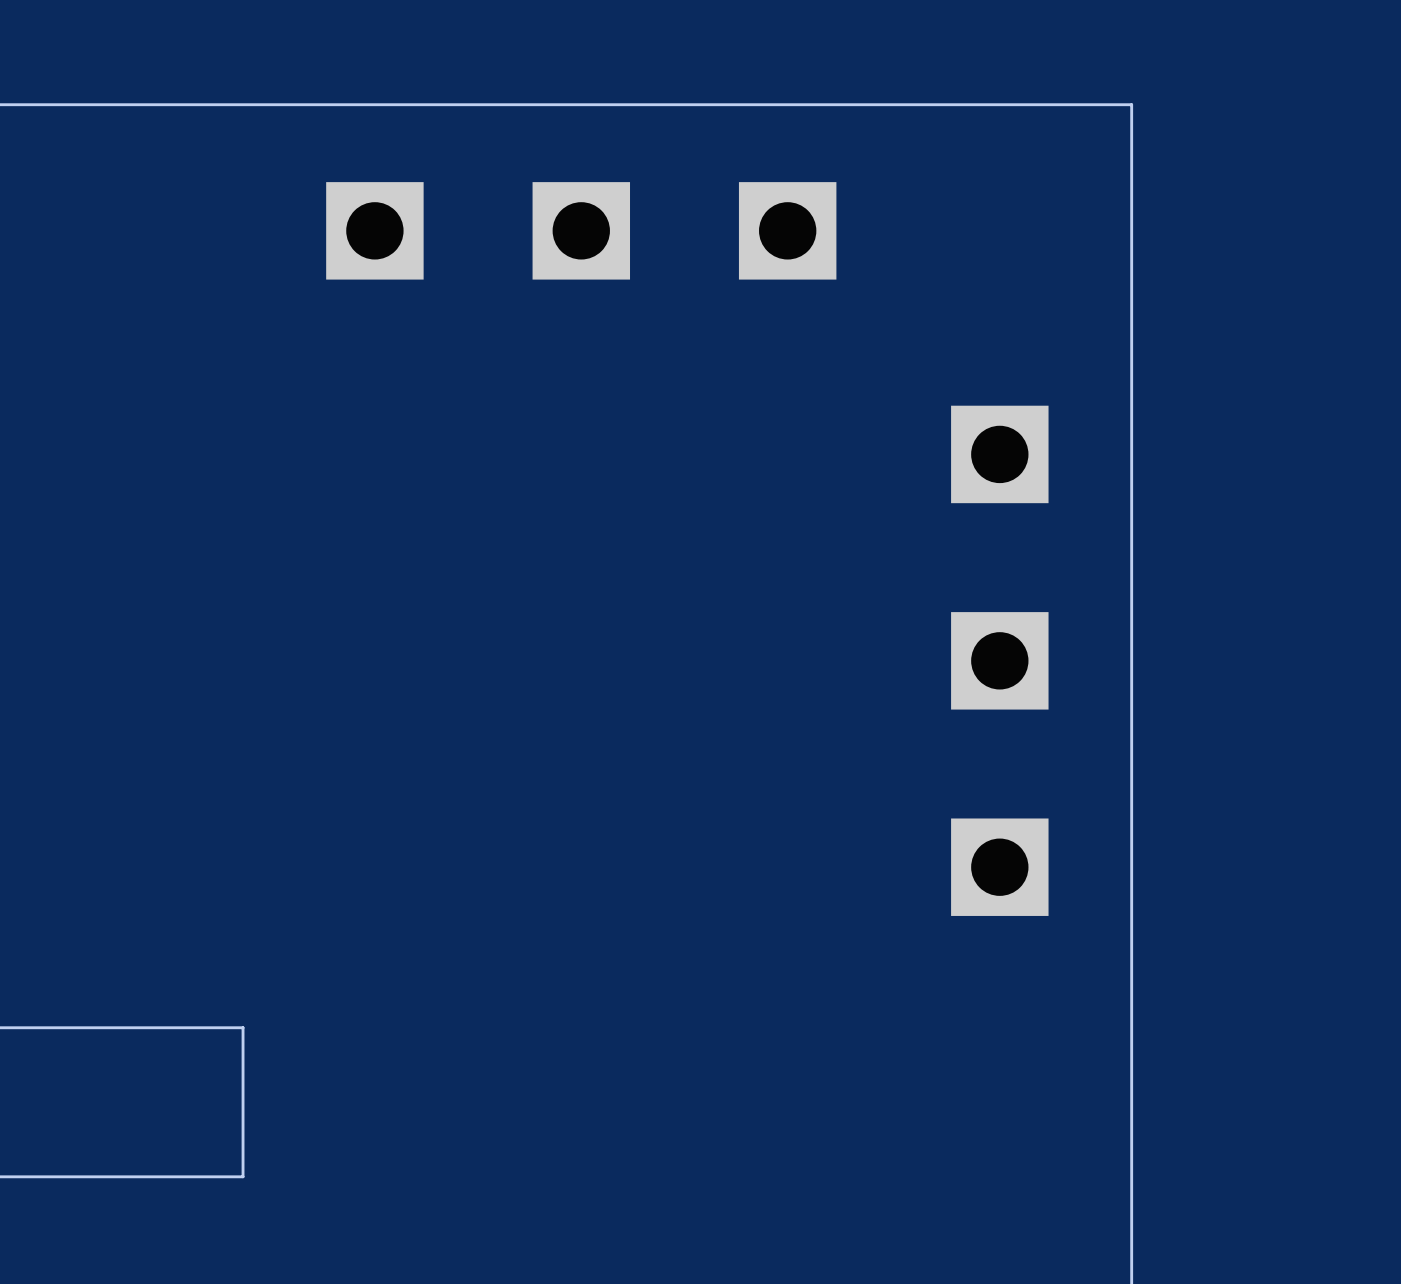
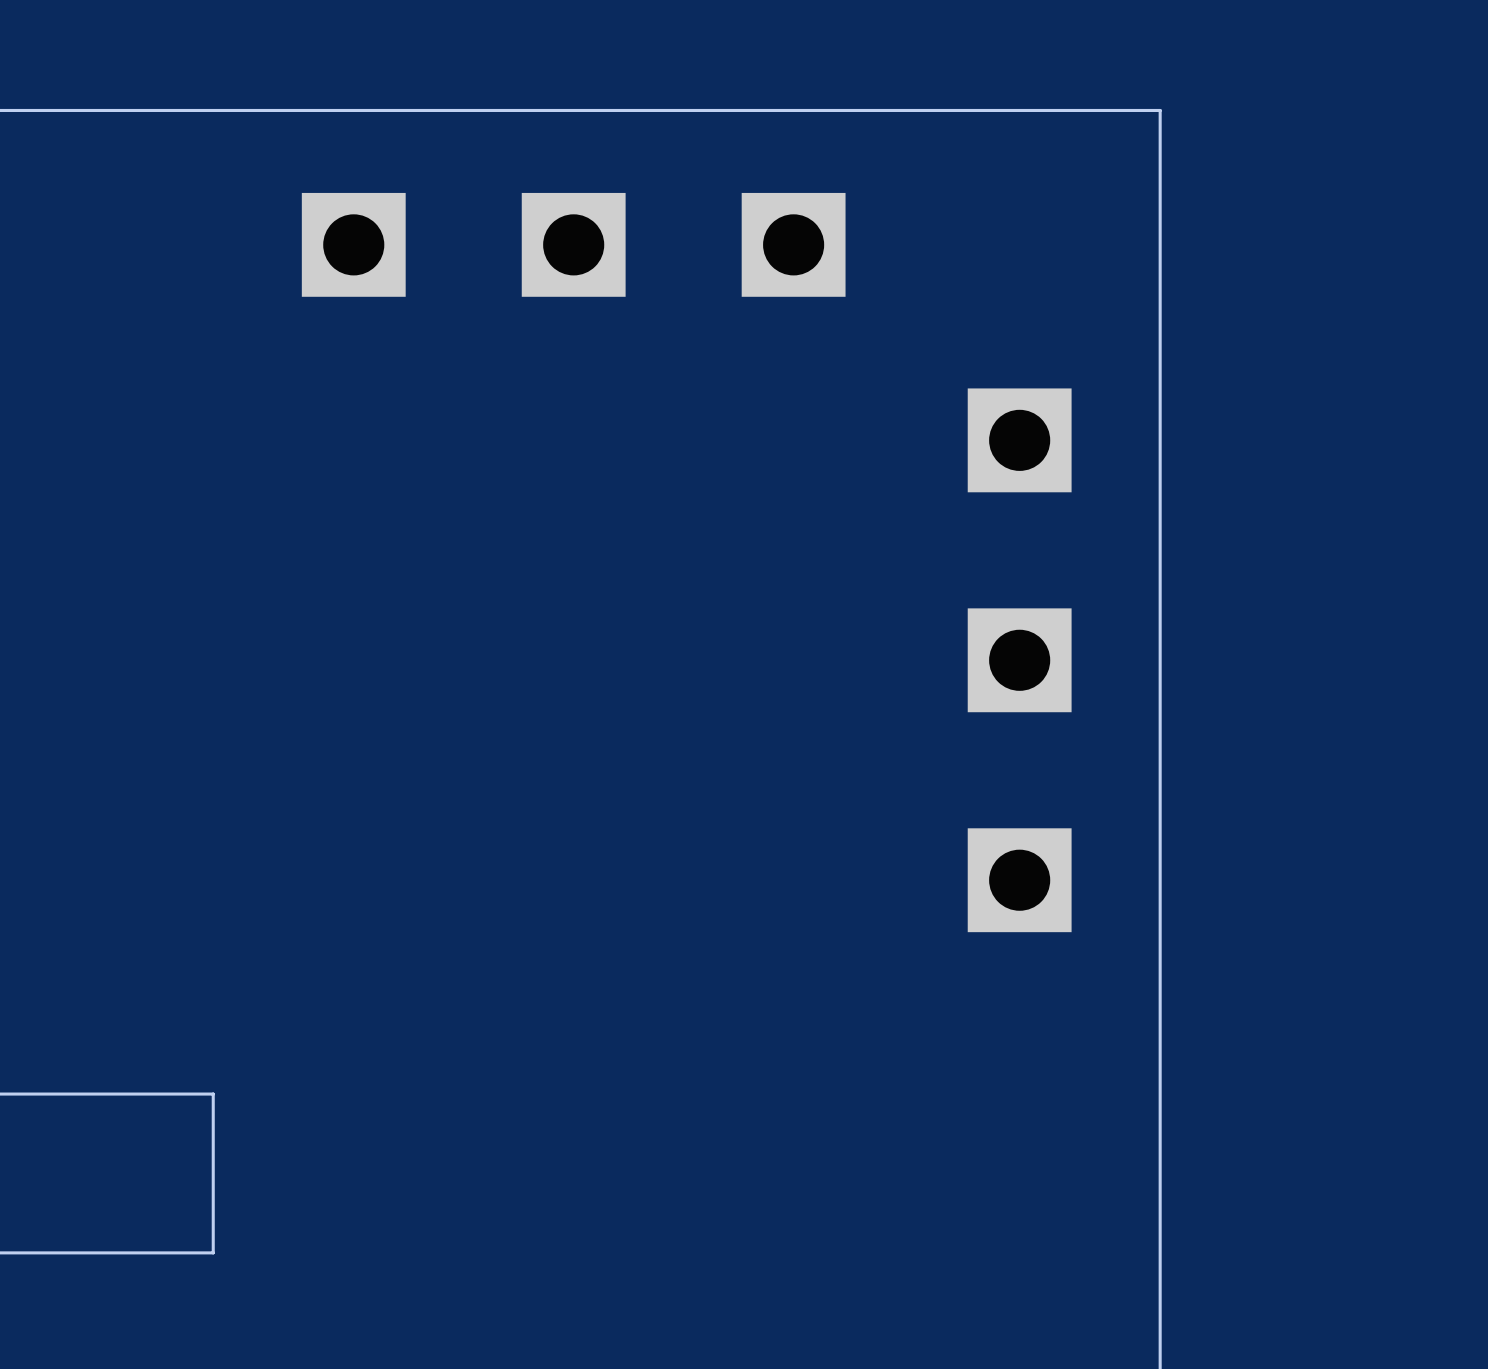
part position: (999, 454) -> (1019, 440)
part position: (999, 660) -> (1019, 660)
part position: (999, 867) -> (1019, 880)

